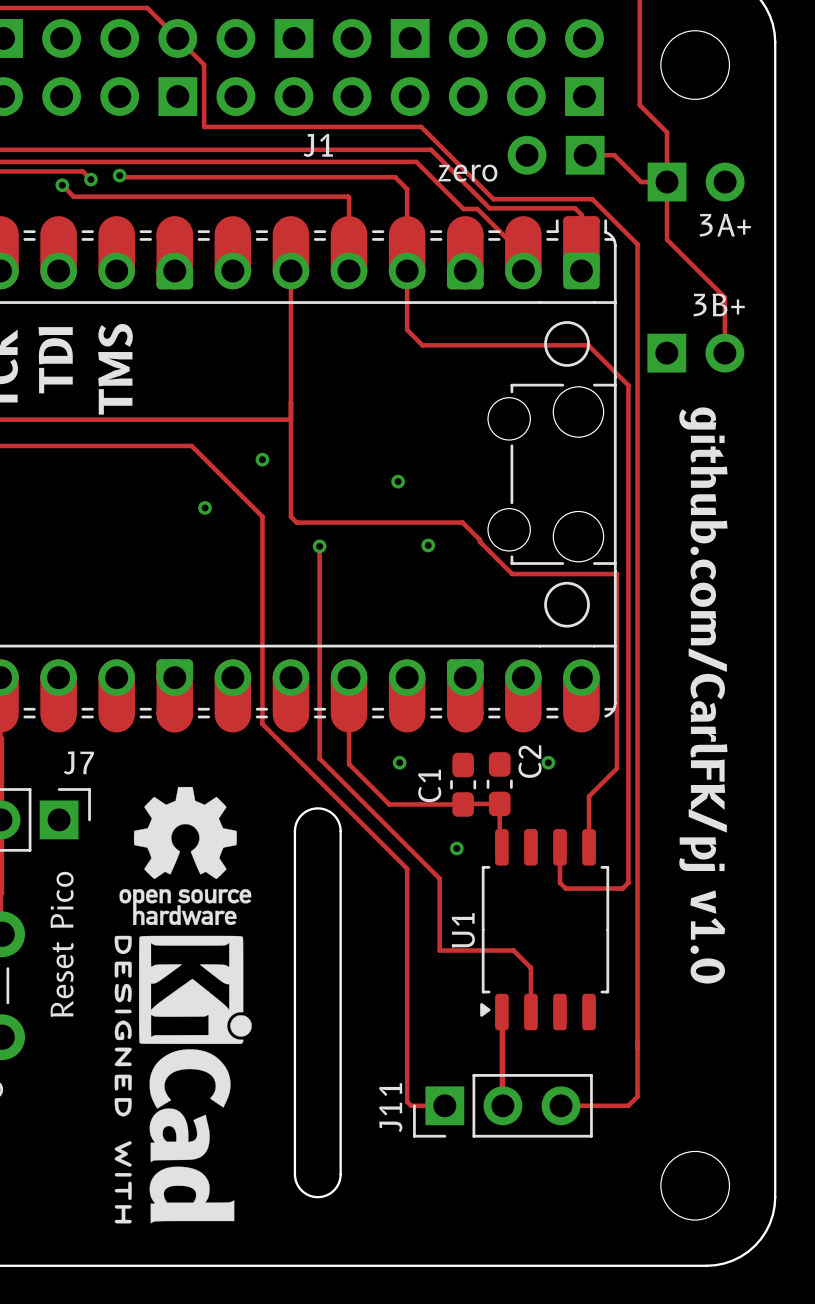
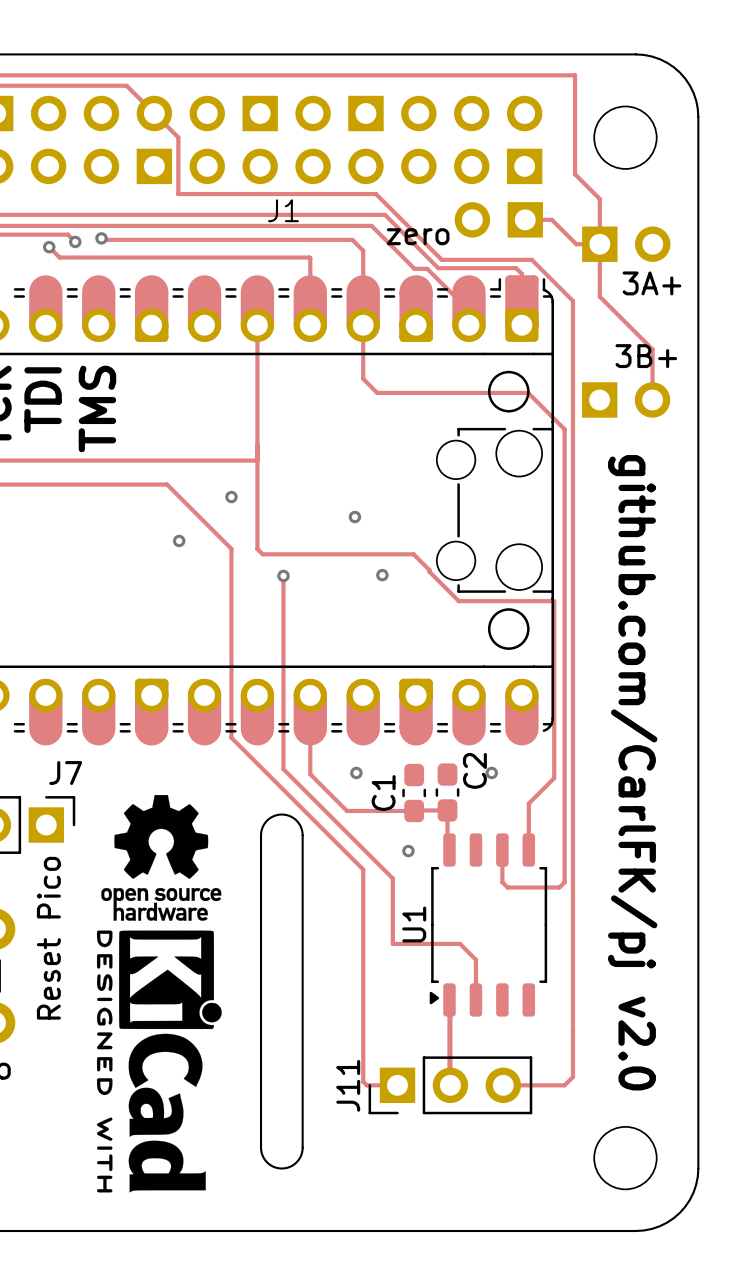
text: github.com/CarlFK/pj v1.0 (703, 695) -> github.com/CarlFK/pj v2.0 (632, 772)

